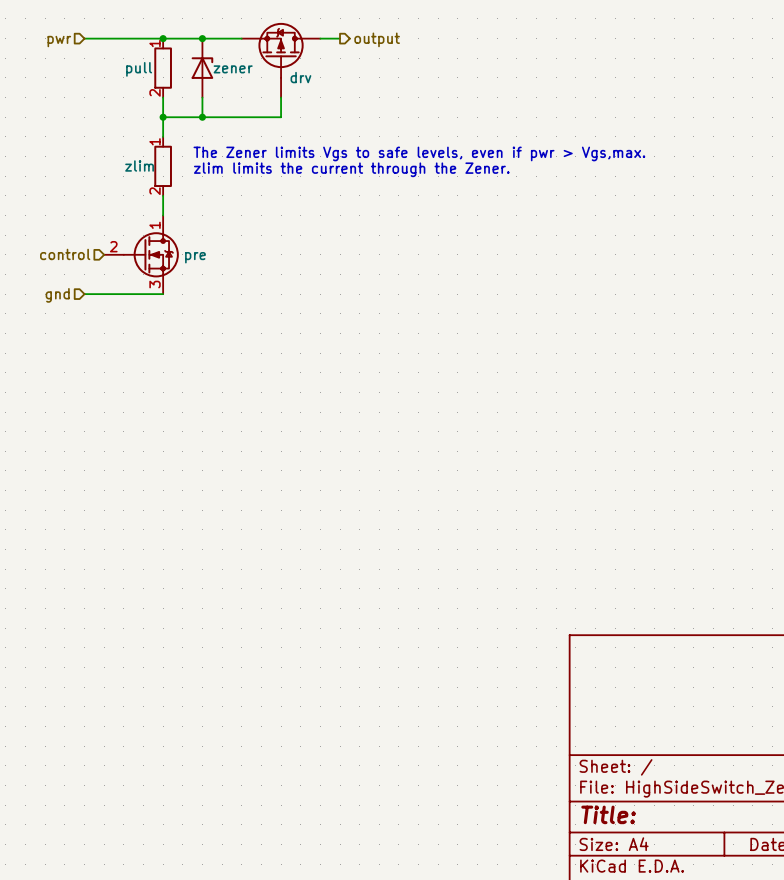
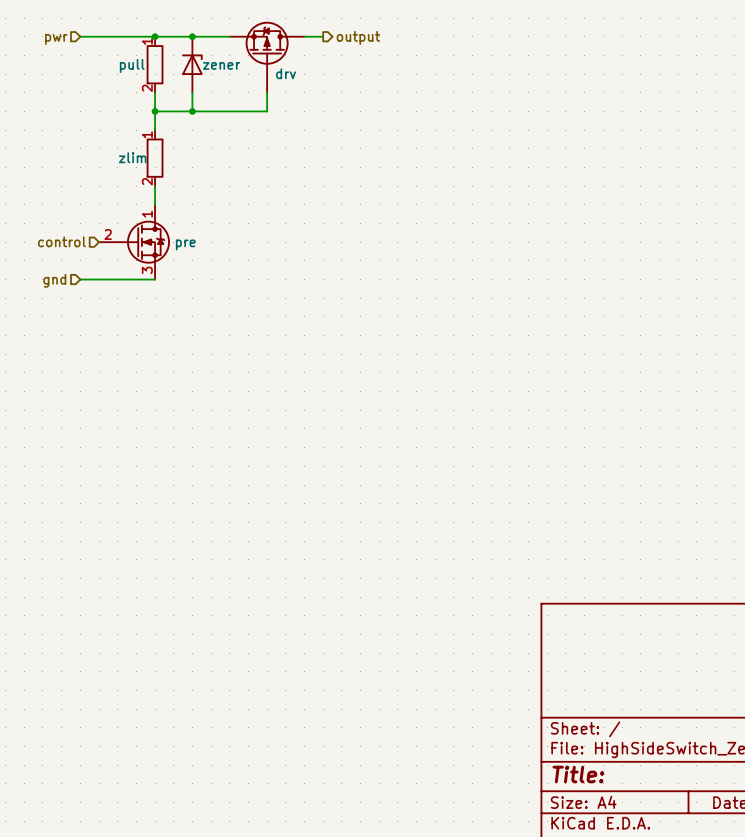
text: The Zener limits Vgs to safe levels, even if pwr > Vgs,max. (419, 153) -> none
text: zlim limits the current through the Zener. (351, 169) -> none

